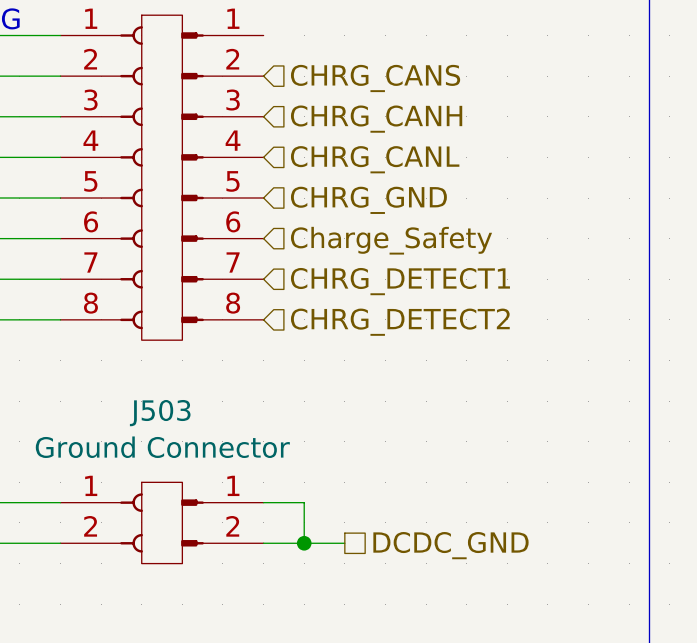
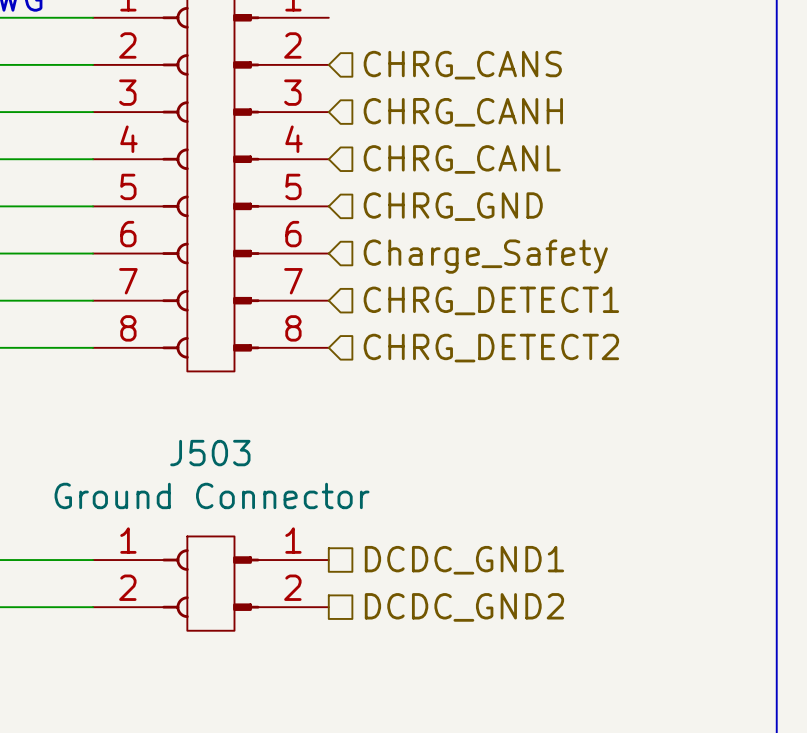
wire: (263, 502) (304, 502) (304, 543) -> none
hierarchical label: none -> DCDC_GND1 (464, 560)
wire: (263, 543) (344, 543) -> none
junction: (304, 543) -> none
hierarchical label: none -> DCDC_GND2 (464, 607)
hierarchical label: DCDC_GND (450, 545) -> none

